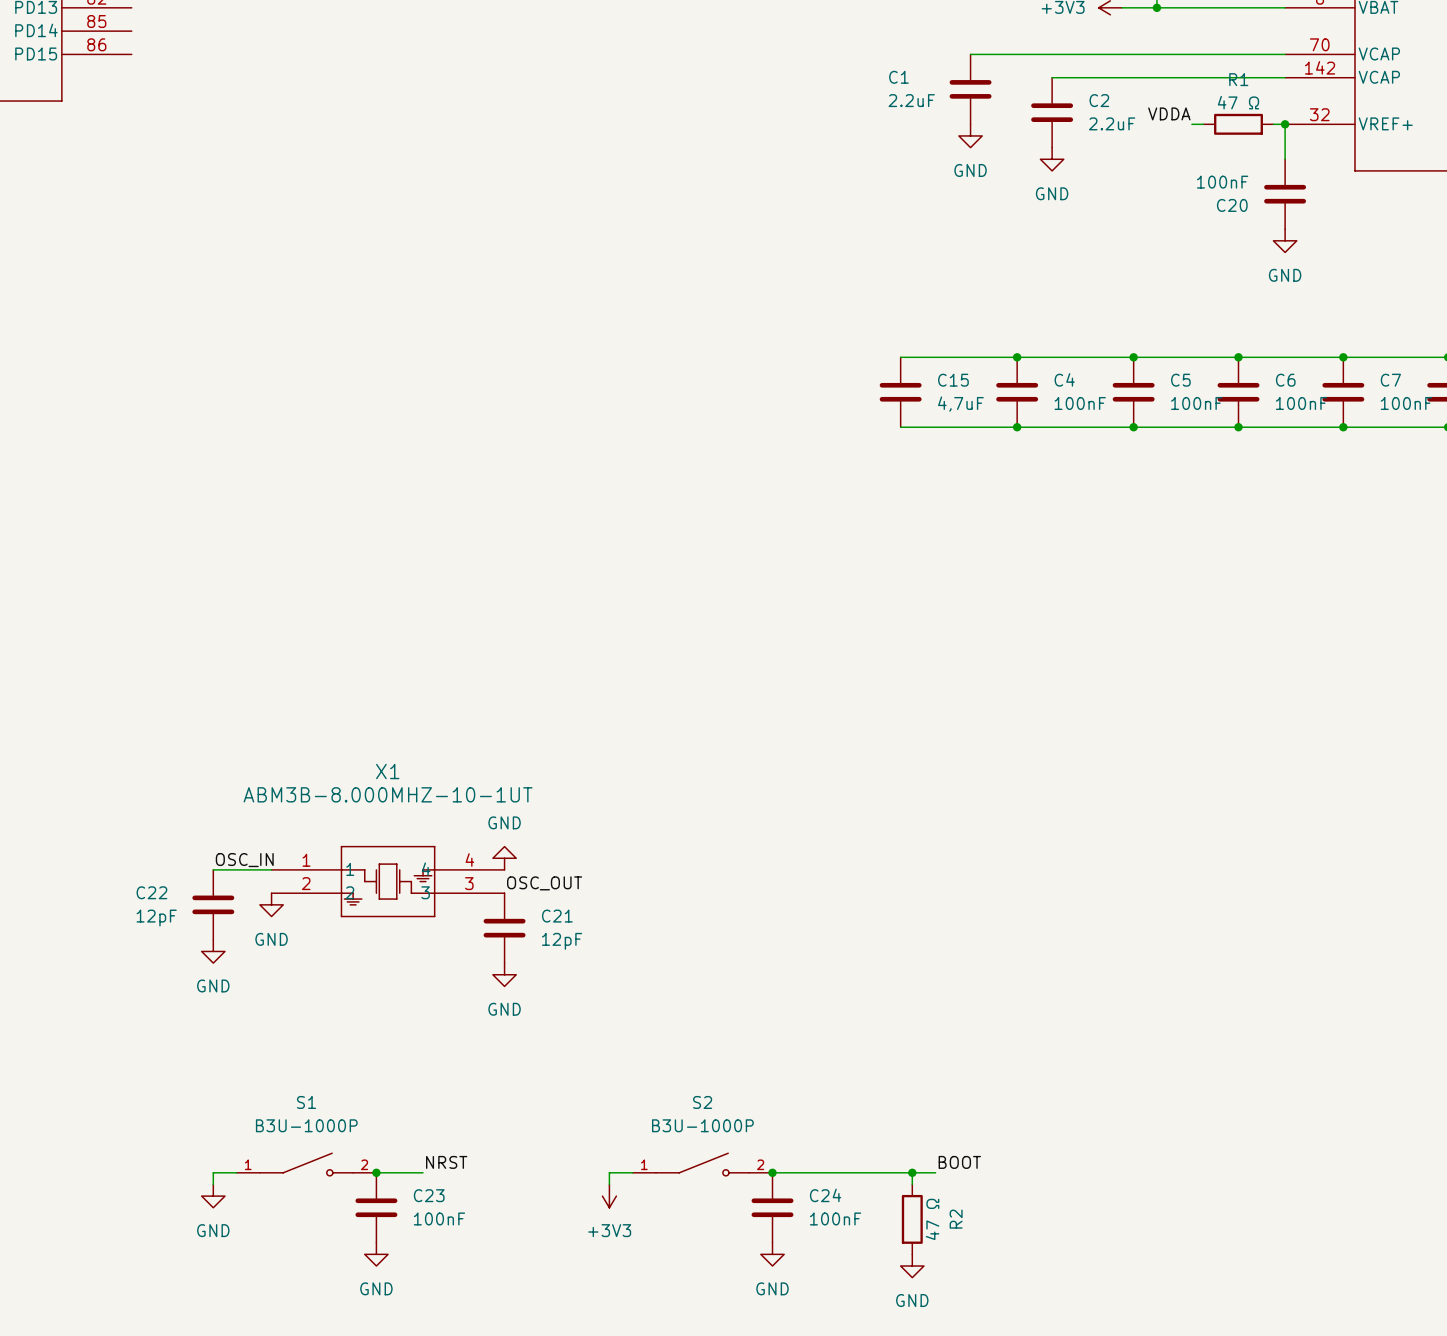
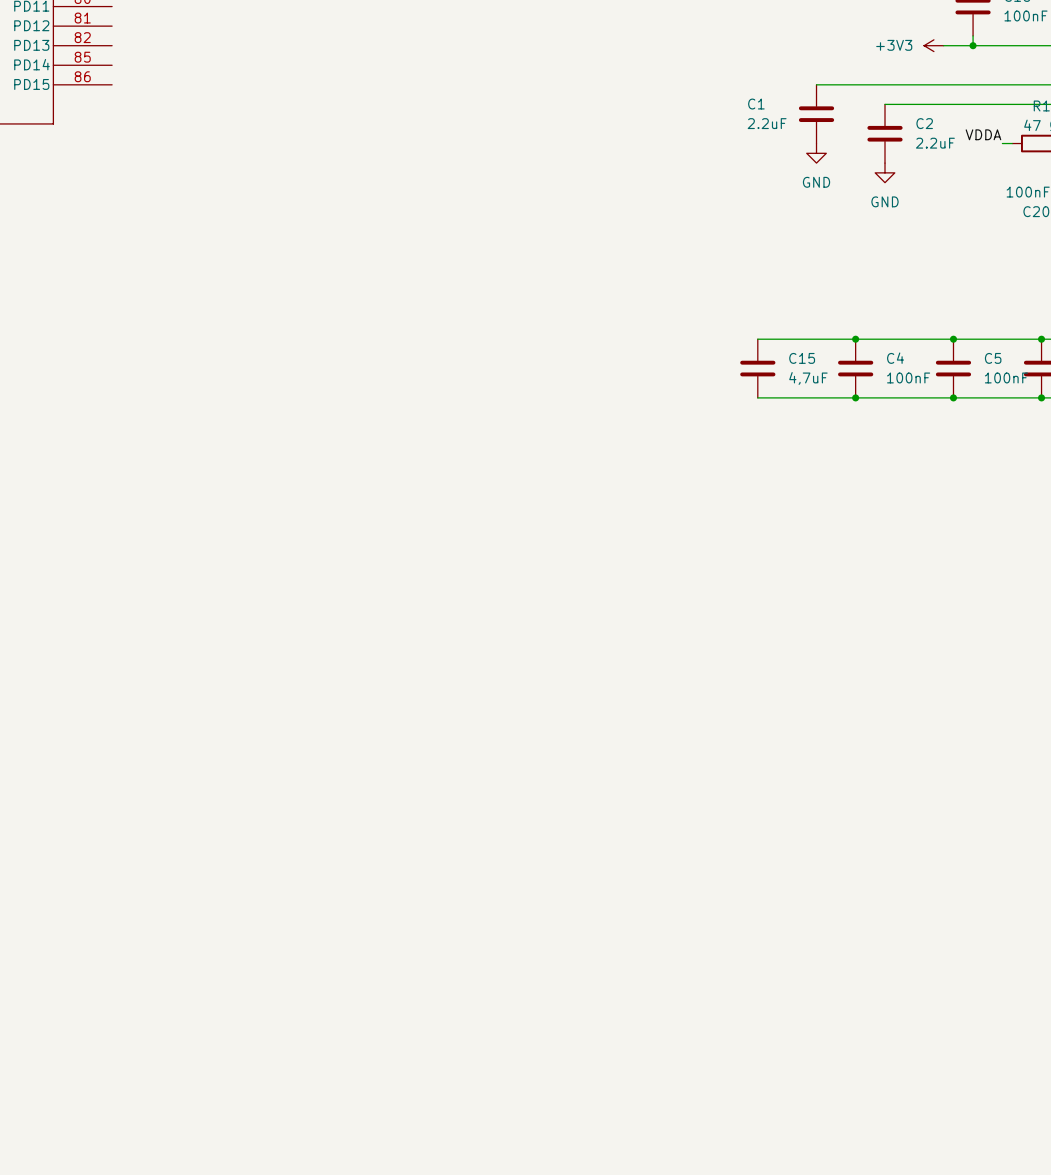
power symbol: GND (504, 858) -> none
label: OSC_IN (244, 860) -> none
wire: (213, 869) (271, 869) -> none
X1: ABM3B-8.000MHZ-10-1UT (388, 881) -> none
label: OSC_OUT (544, 883) -> none
C22: 12pF (213, 904) -> none
power symbol: GND (271, 904) -> none
C21: 12pF (504, 928) -> none
power symbol: GND (213, 951) -> none
power symbol: GND (504, 974) -> none
label: NRST (446, 1162) -> none
label: BOOT (959, 1162) -> none
S1: B3U-1000P (306, 1164) -> none
S2: B3U-1000P (702, 1164) -> none
wire: (236, 1172) (213, 1172) (213, 1184) -> none
wire: (376, 1172) (423, 1172) -> none
junction: (376, 1172) -> none
wire: (632, 1172) (609, 1172) (609, 1184) -> none
wire: (772, 1172) (935, 1172) -> none
junction: (772, 1172) -> none
wire: (912, 1172) (912, 1184) -> none
junction: (912, 1172) -> none
power symbol: GND (213, 1196) -> none
power symbol: +3V3 (609, 1196) -> none
C23: 100nF (376, 1207) -> none
C24: 100nF (772, 1207) -> none
R2: 47 Ω (912, 1219) -> none
power symbol: GND (376, 1254) -> none
power symbol: GND (772, 1254) -> none
power symbol: GND (912, 1266) -> none

